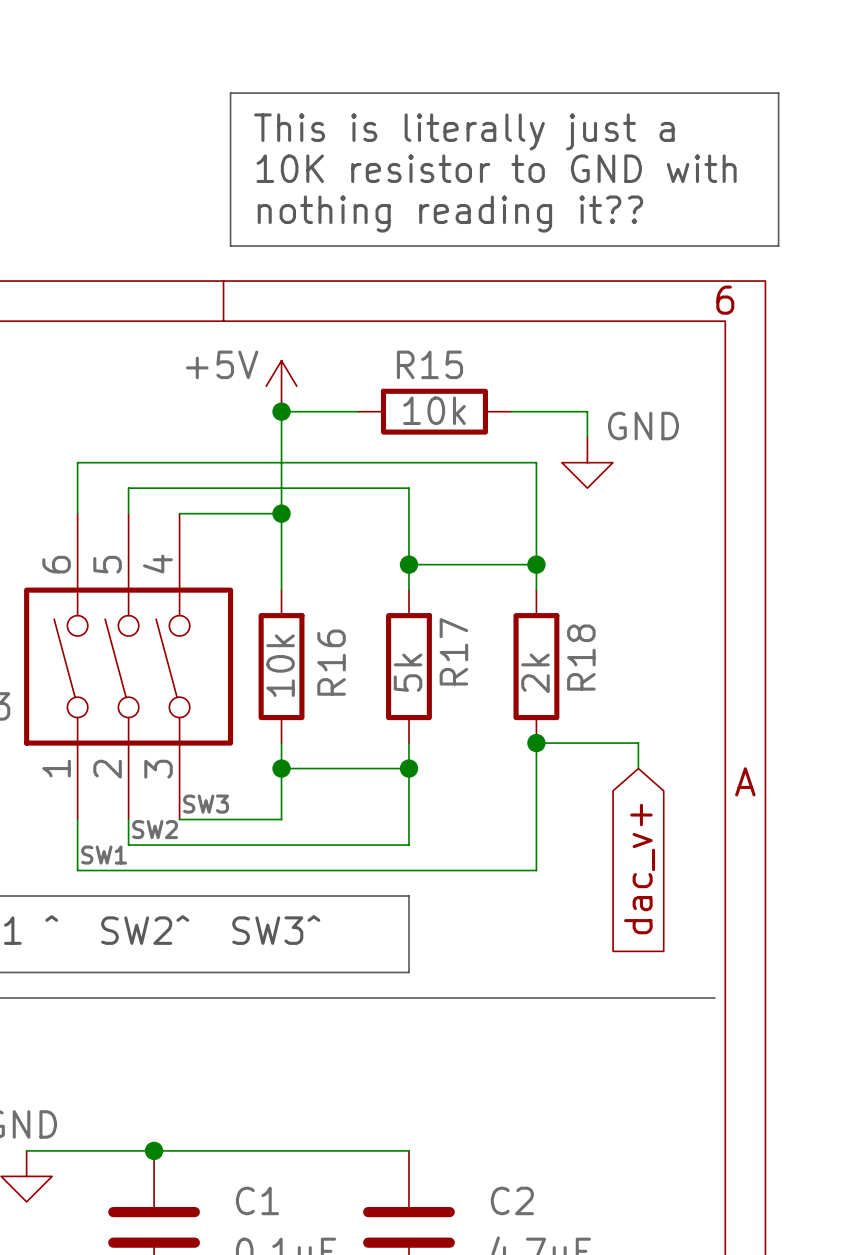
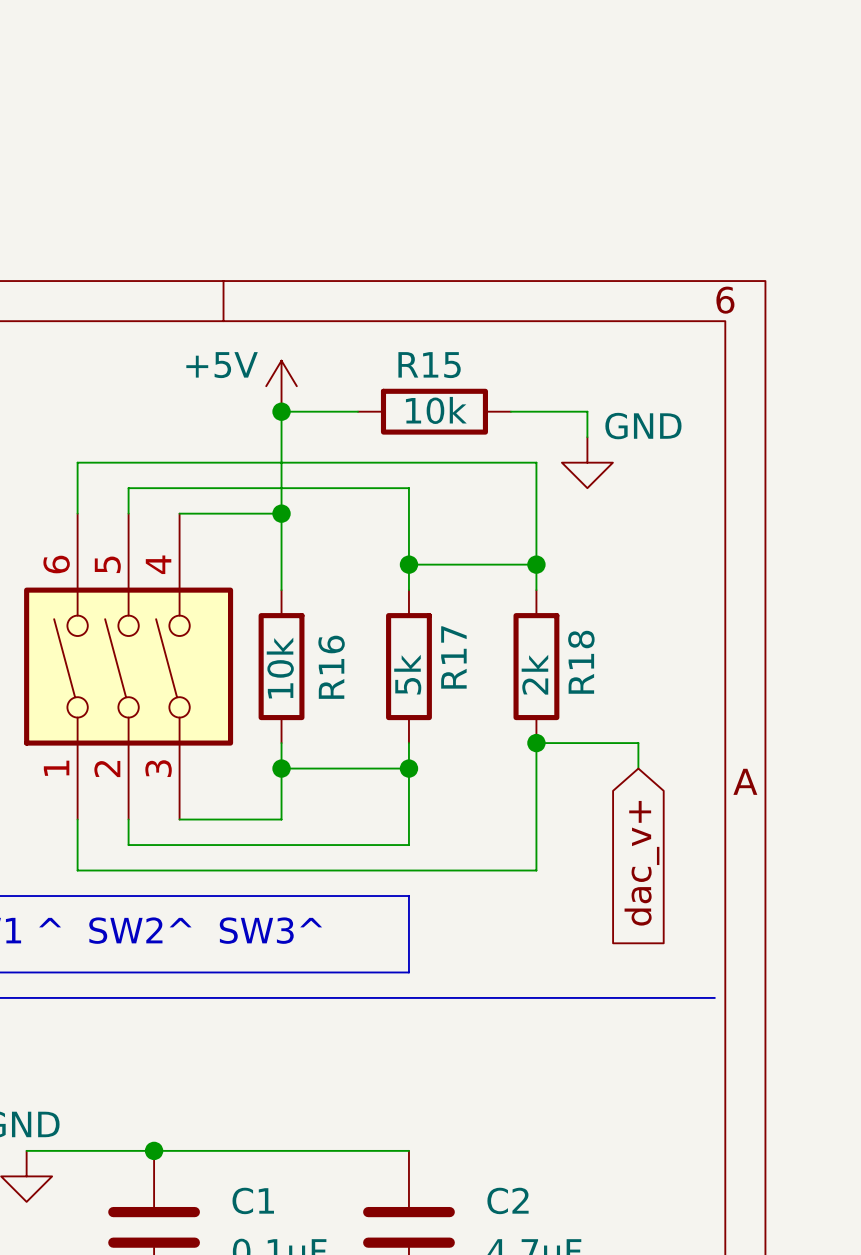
line: (230, 93) (778, 93) (778, 246) (230, 246) (230, 93) -> none
text: This is literally just a (464, 131) -> none
text: 10K resistor to GND with (496, 168) -> none
text: nothing reading it?? (450, 214) -> none
label: SW3 (206, 804) -> none
label: SW2 (155, 829) -> none
label: SW1 (104, 855) -> none

